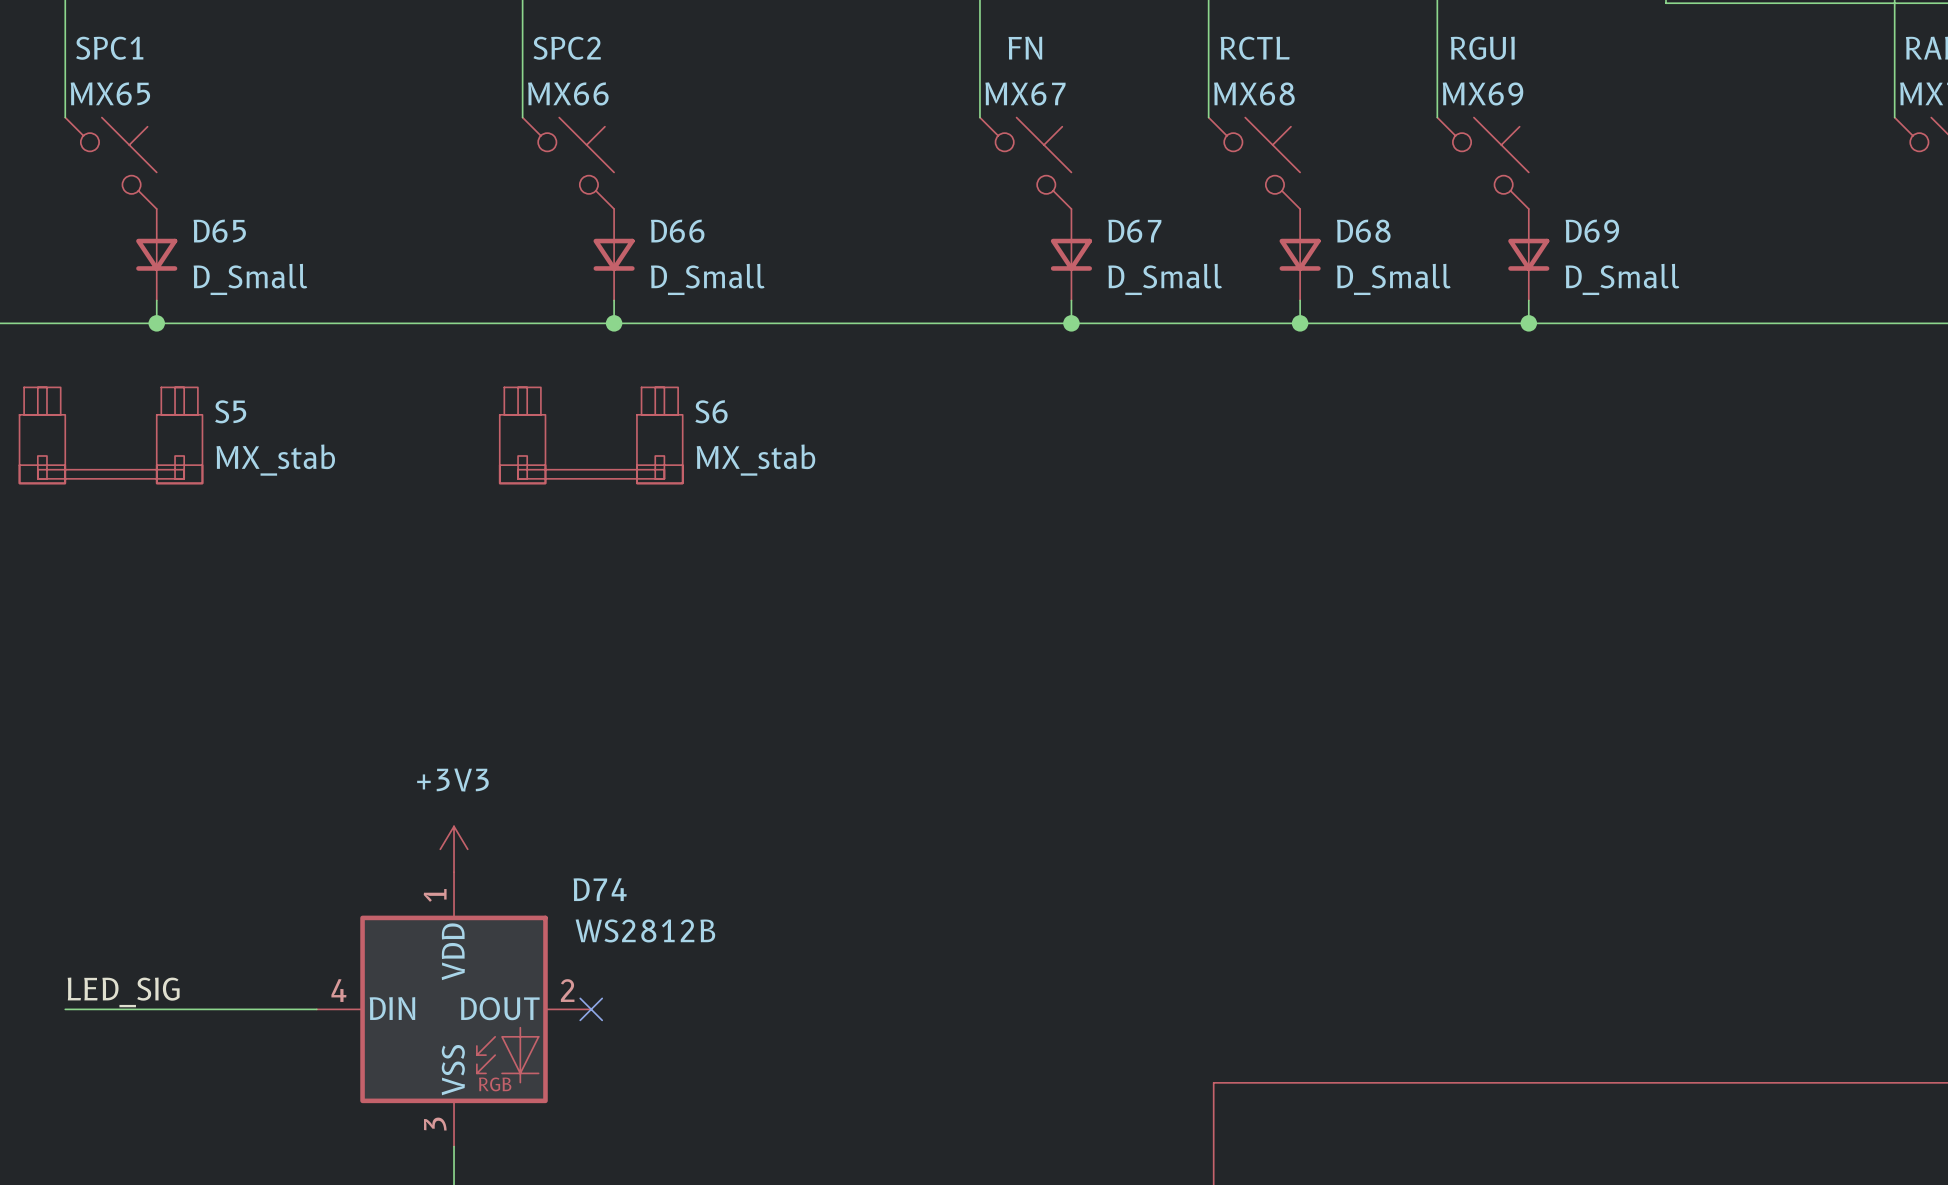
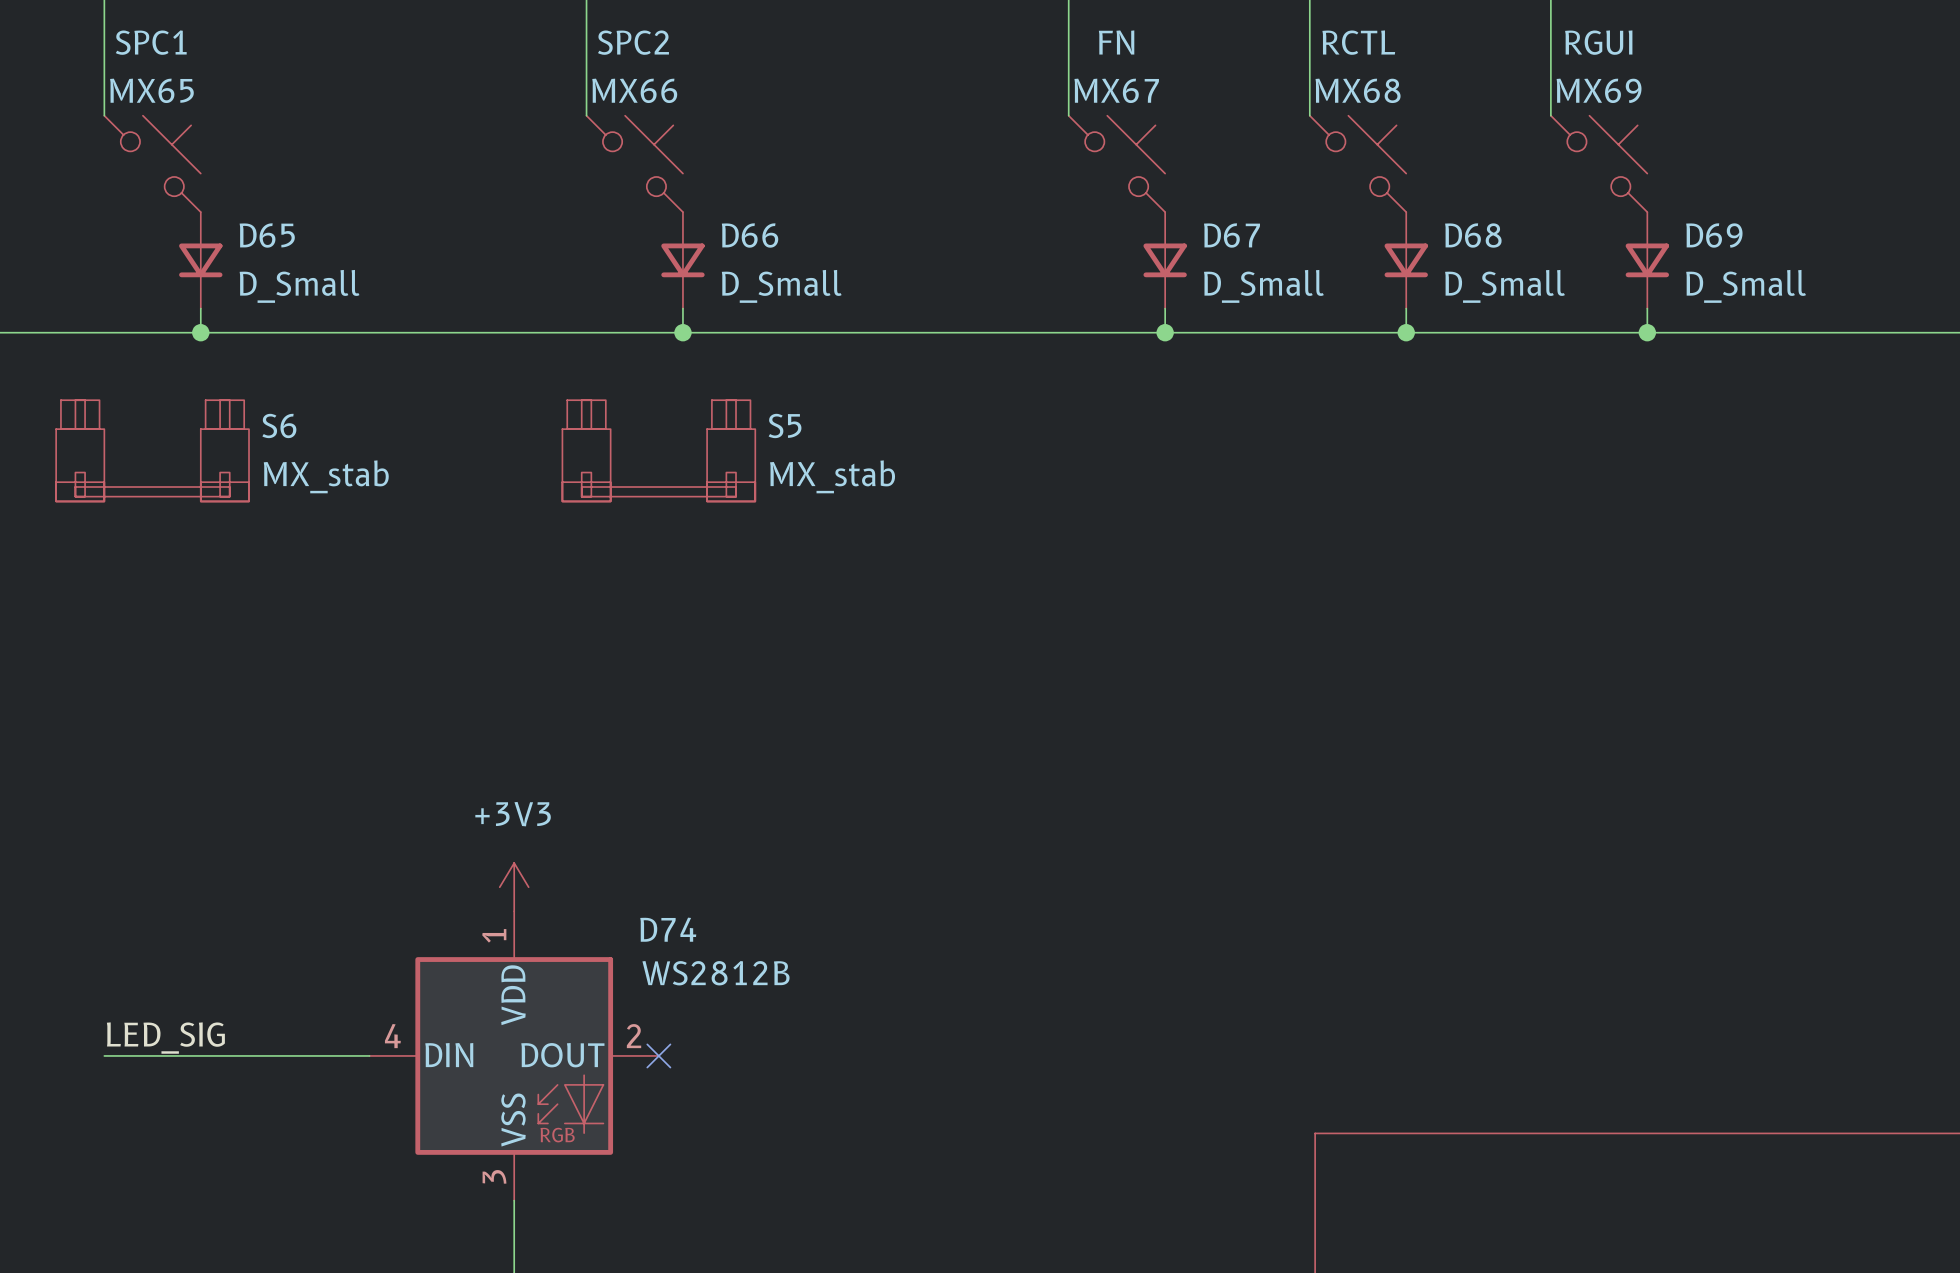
S5 name: S5 (230, 411) -> S6 (279, 425)
S6 name: S6 (711, 411) -> S5 (785, 425)

